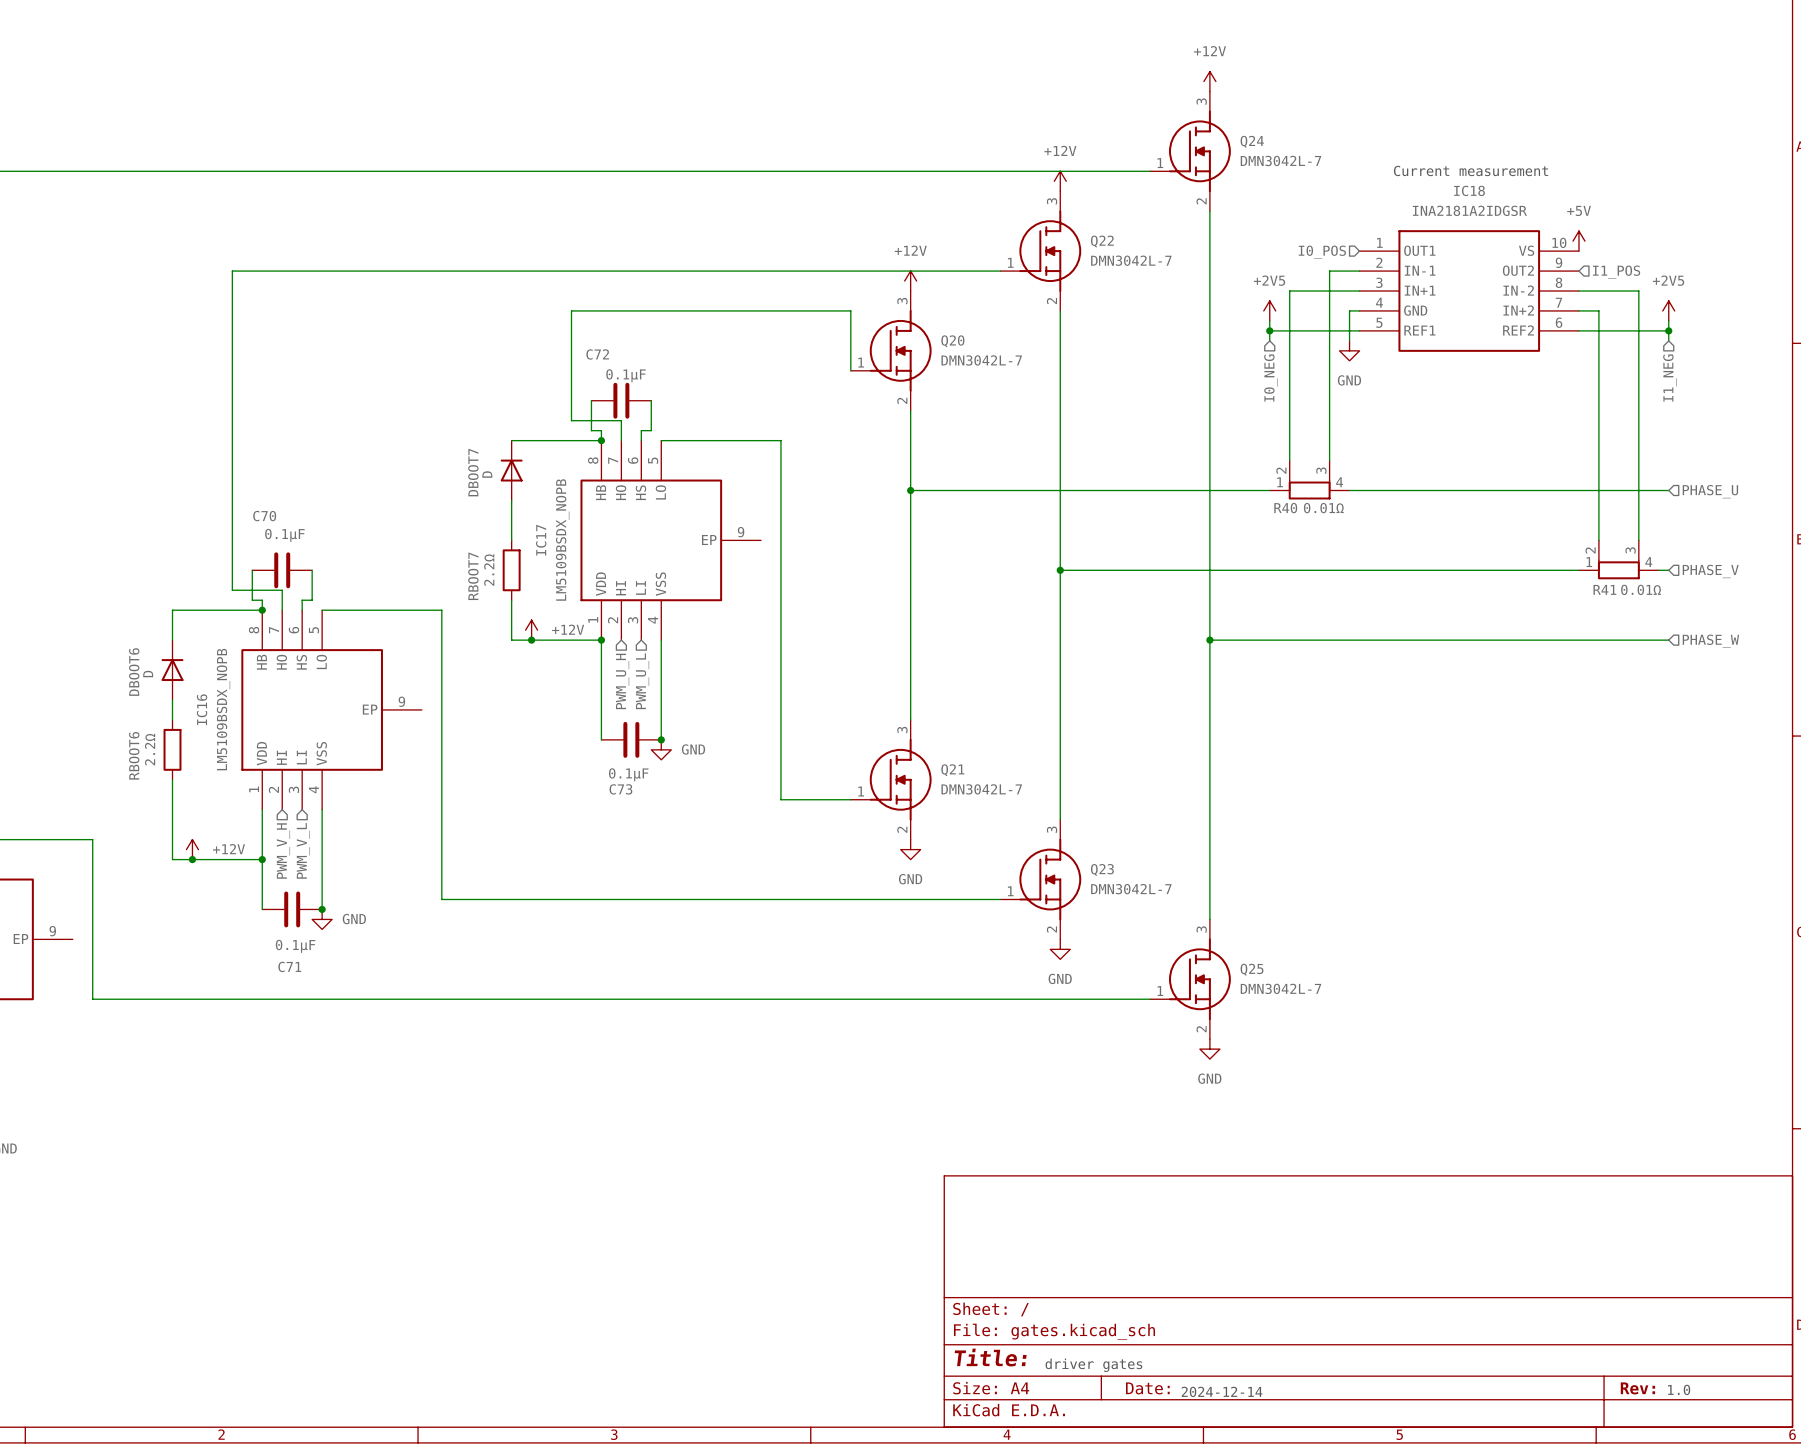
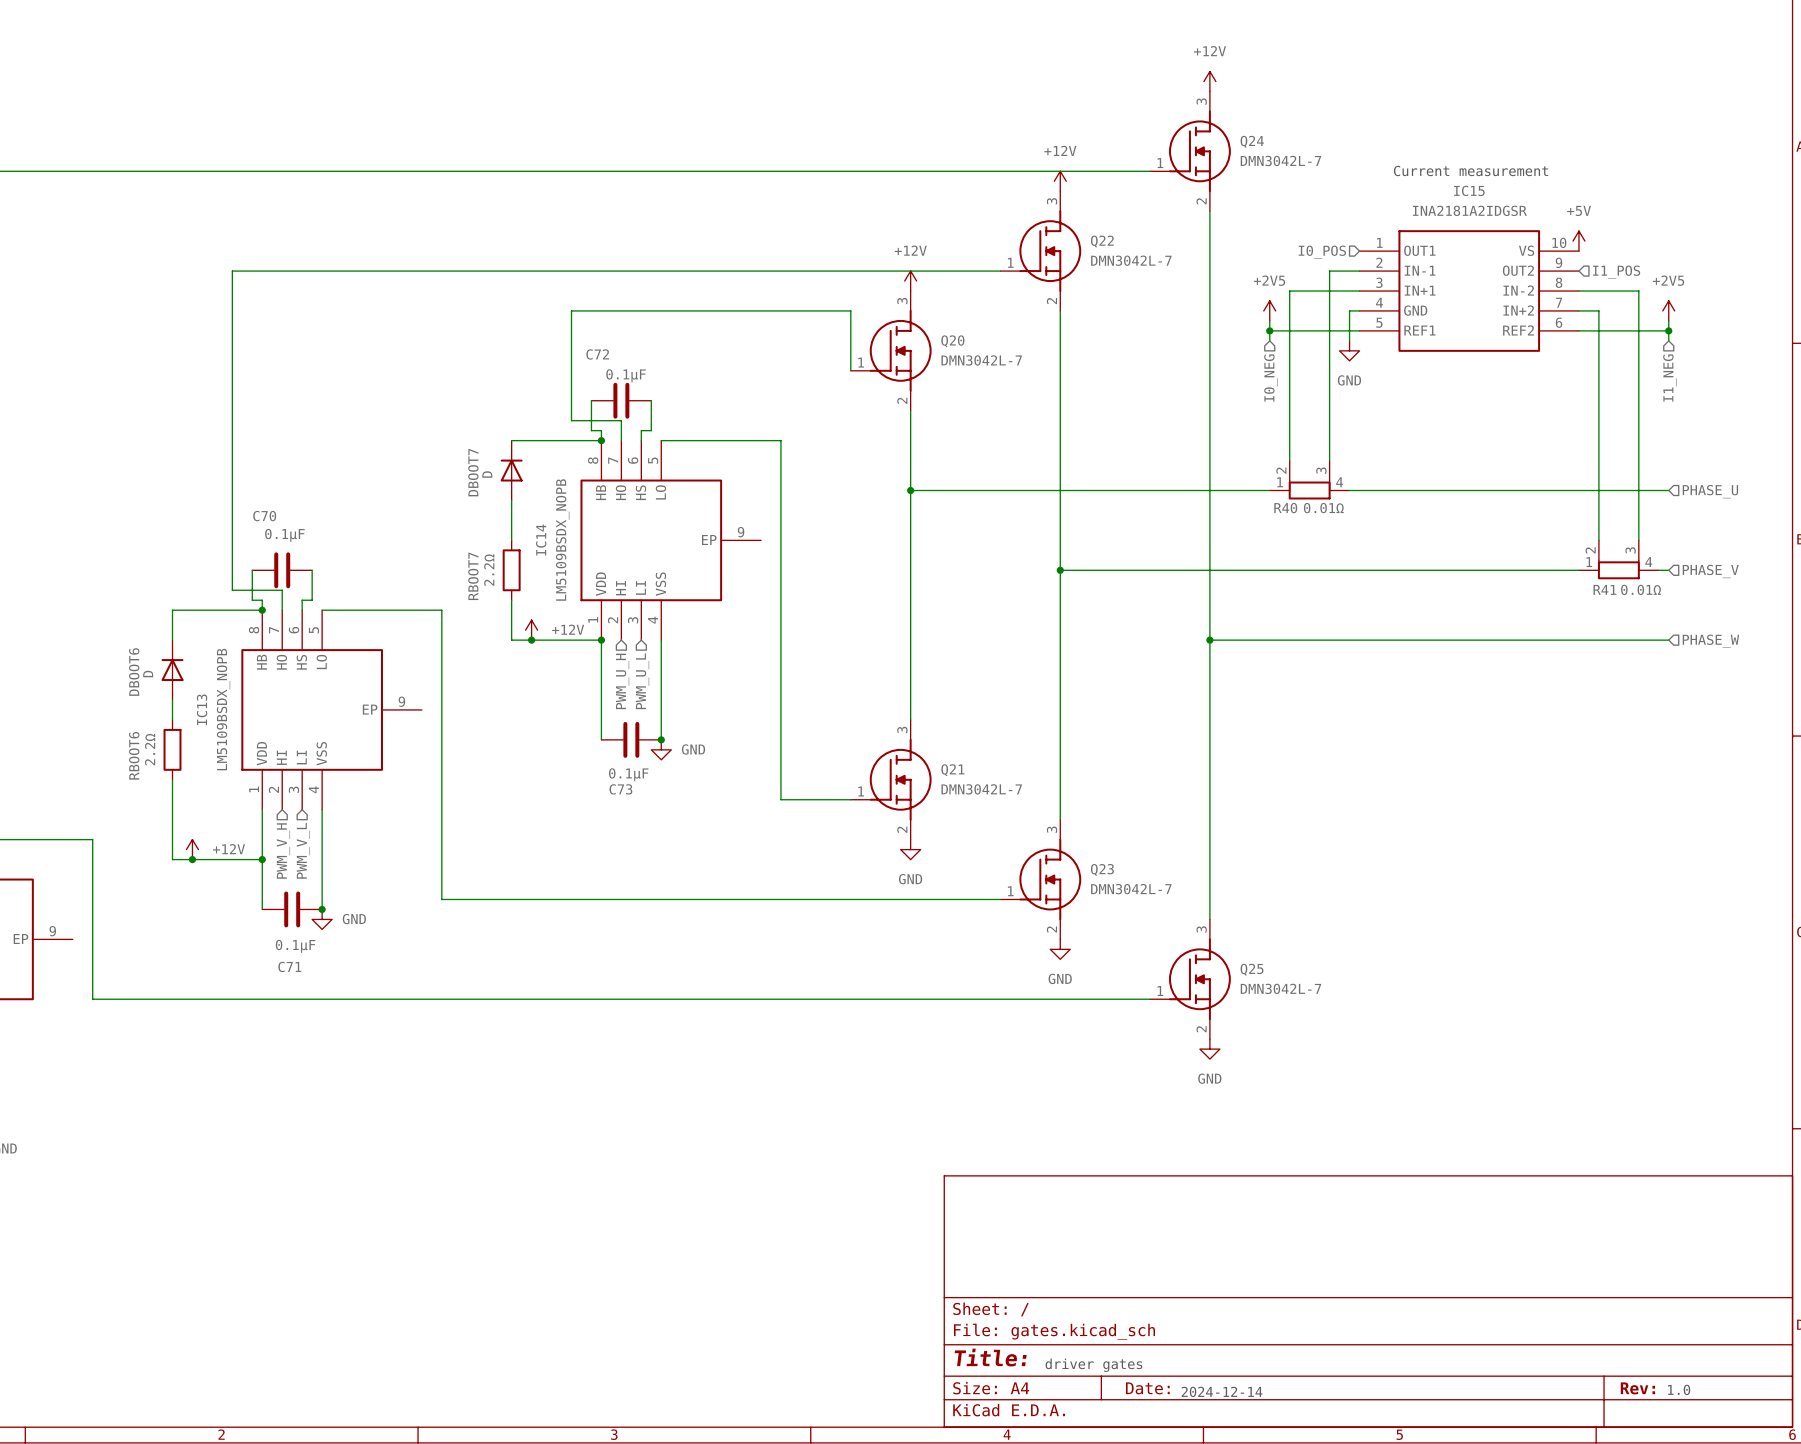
IC18 name: IC18 (1469, 190) -> IC15 (1469, 190)
IC17 name: IC17 (541, 540) -> IC14 (541, 540)
IC16 name: IC16 (202, 709) -> IC13 (202, 709)

